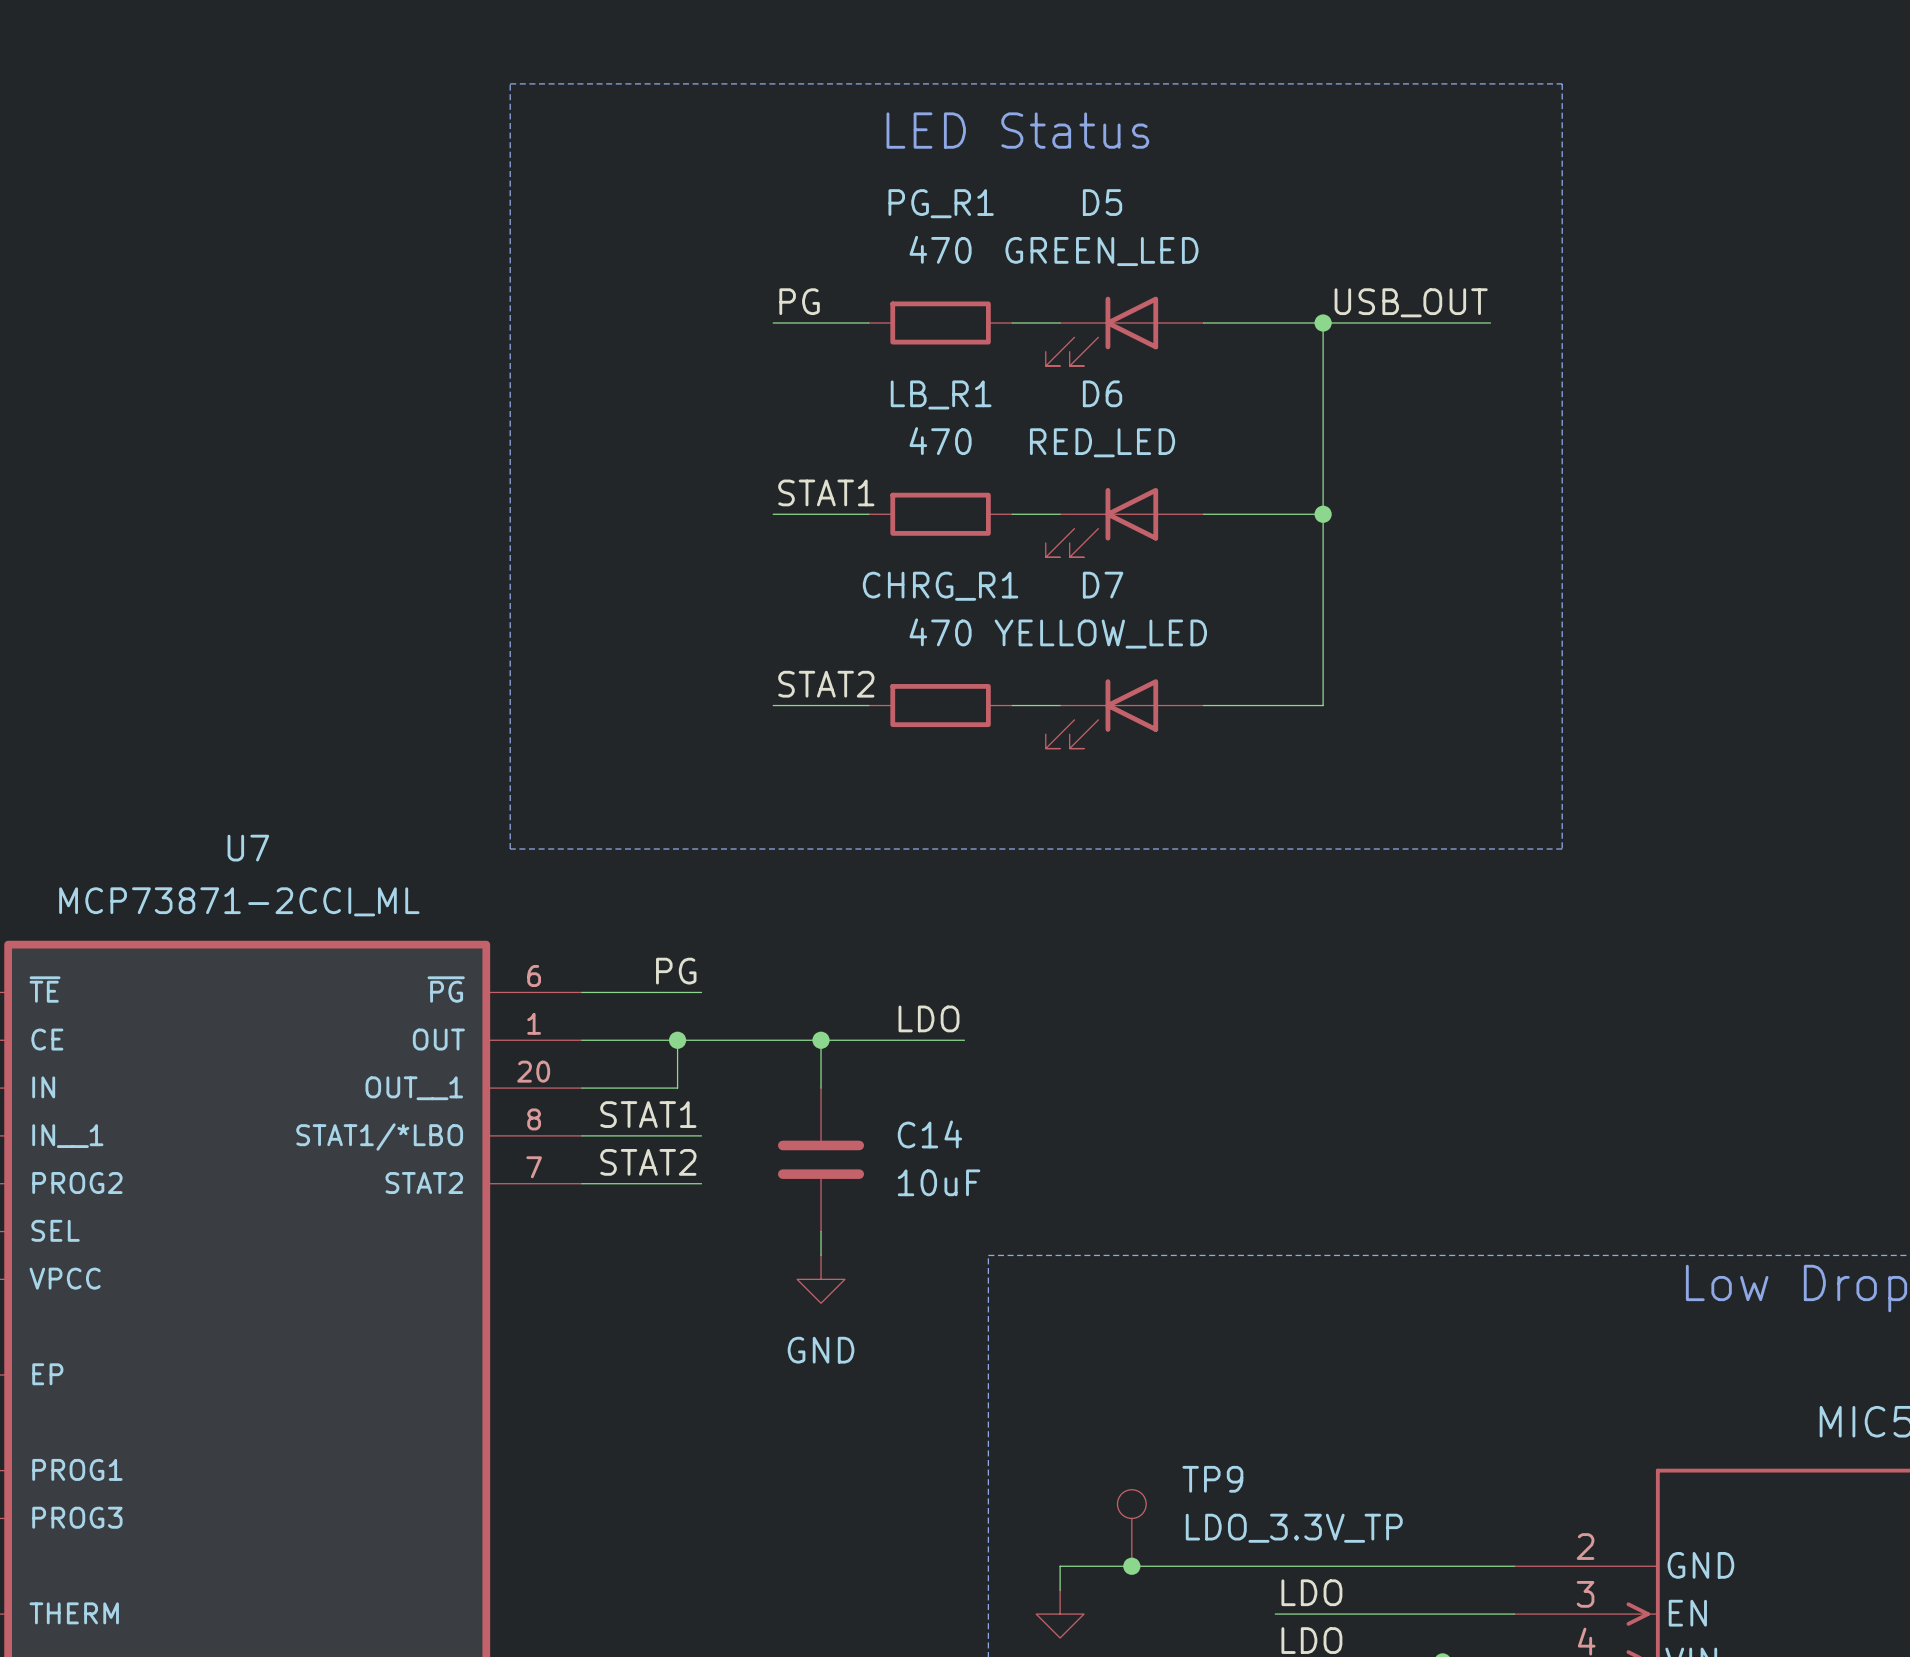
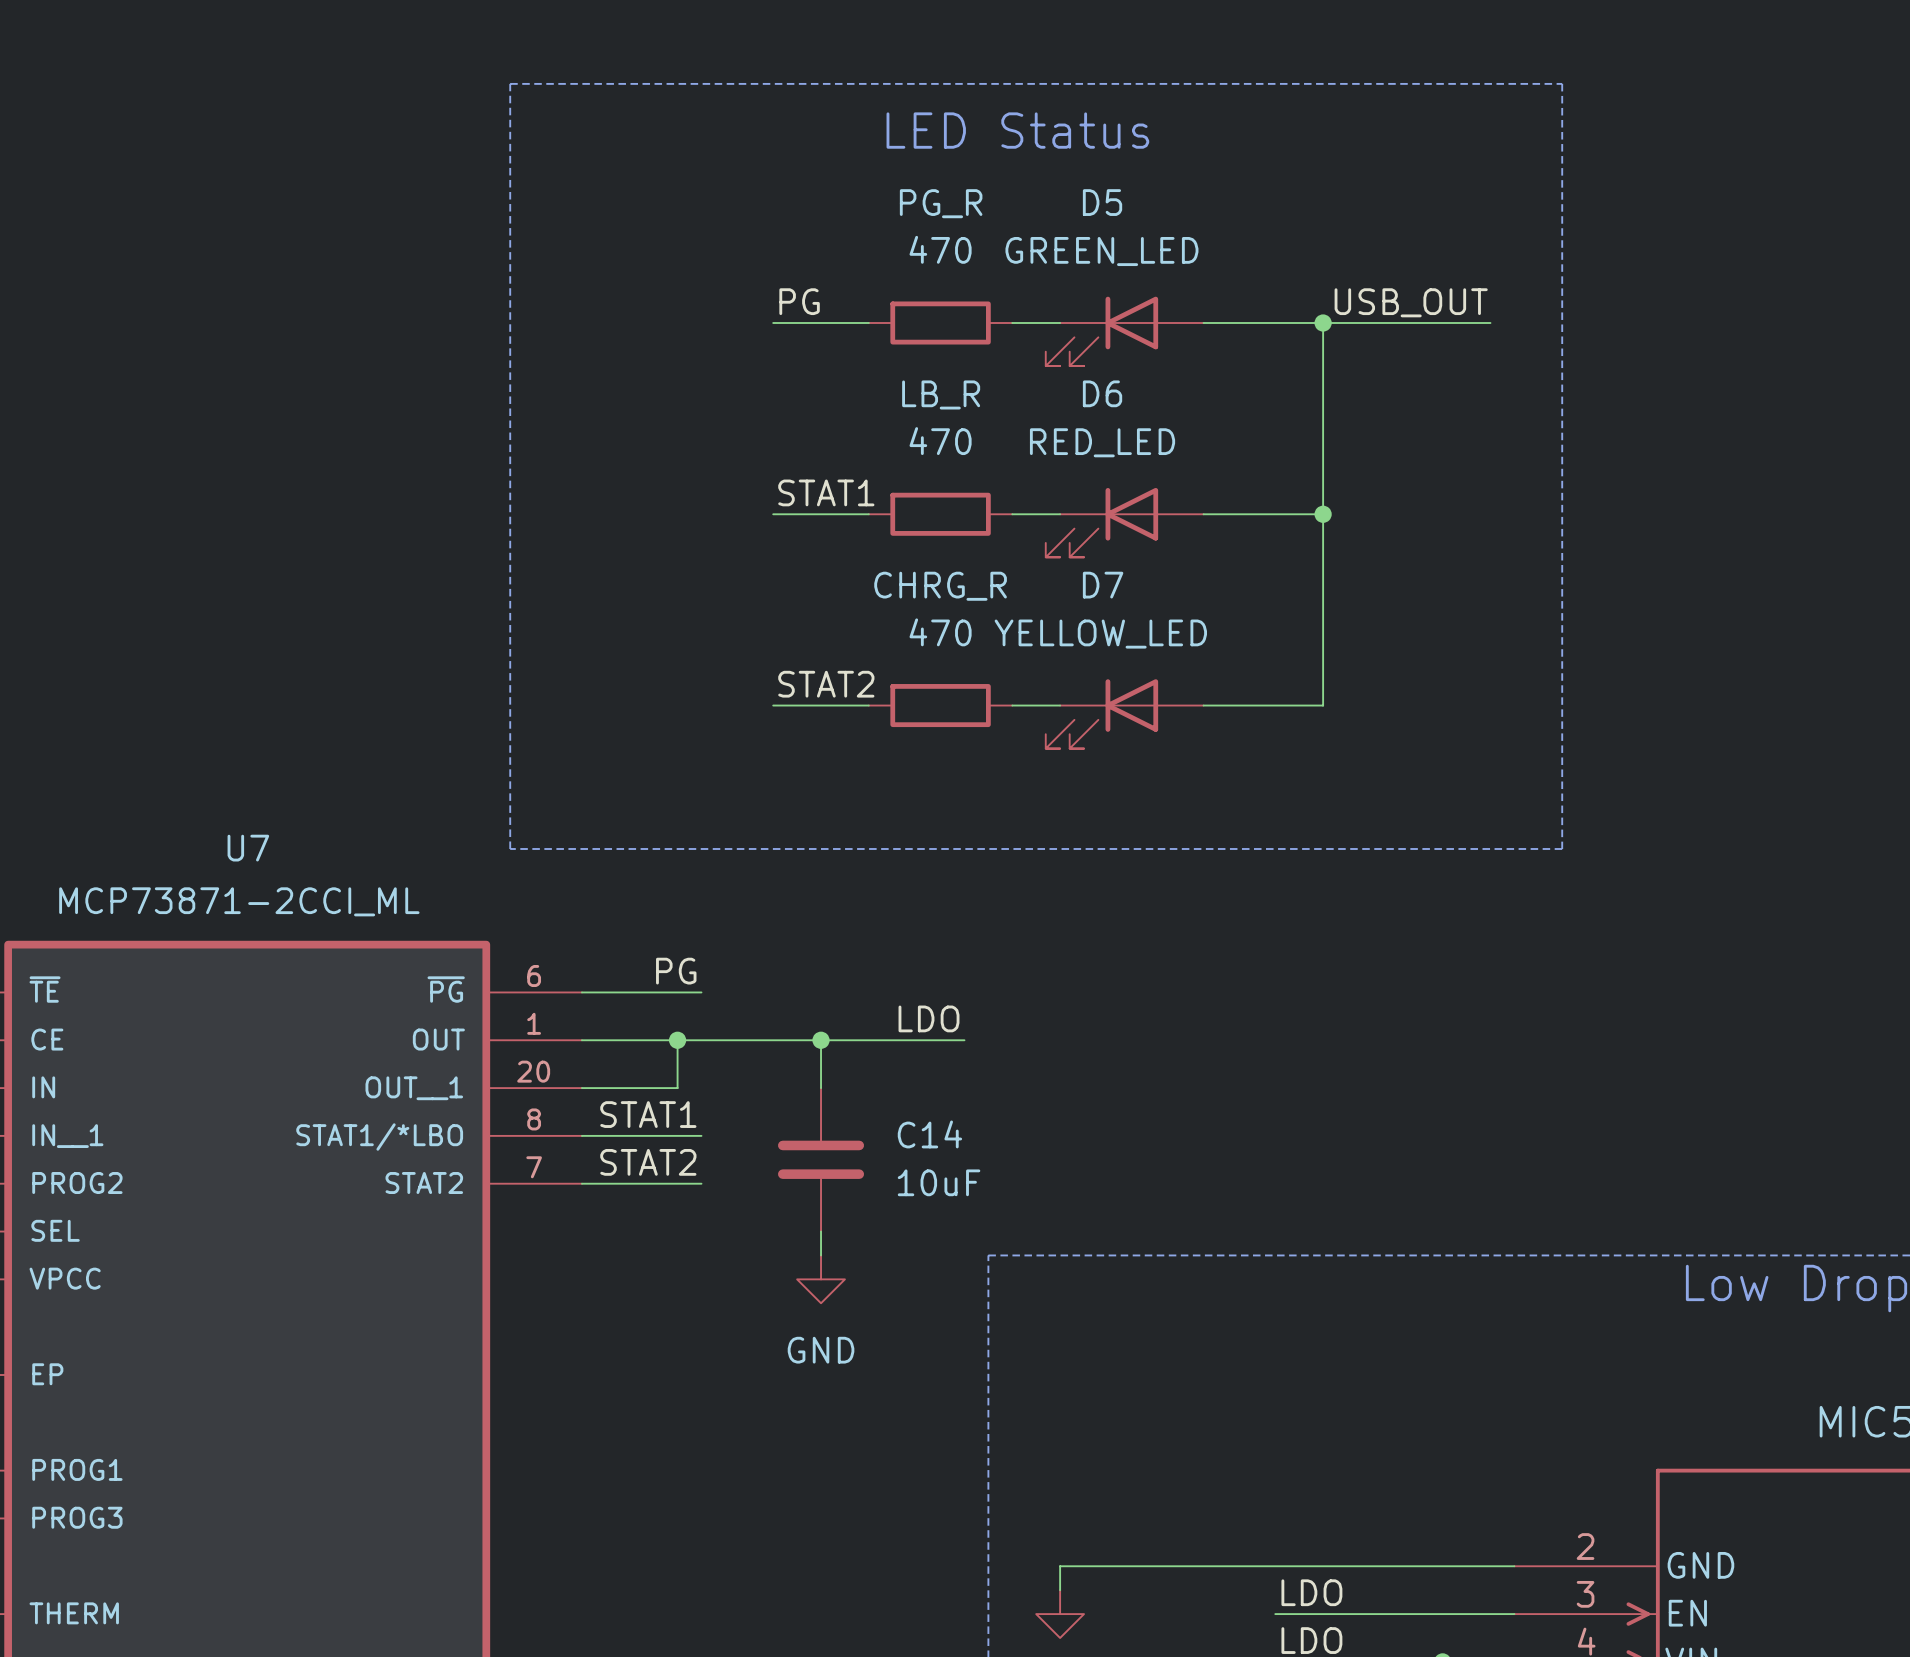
PG_R1 name: PG_R1 (941, 203) -> PG_R (941, 203)
LB_R1 name: LB_R1 (941, 394) -> LB_R (941, 394)
CHRG_R1 name: CHRG_R1 (940, 586) -> CHRG_R (940, 586)
TP9: LDO_3.3V_TP (1131, 1528) -> none
junction: (1131, 1566) -> none

